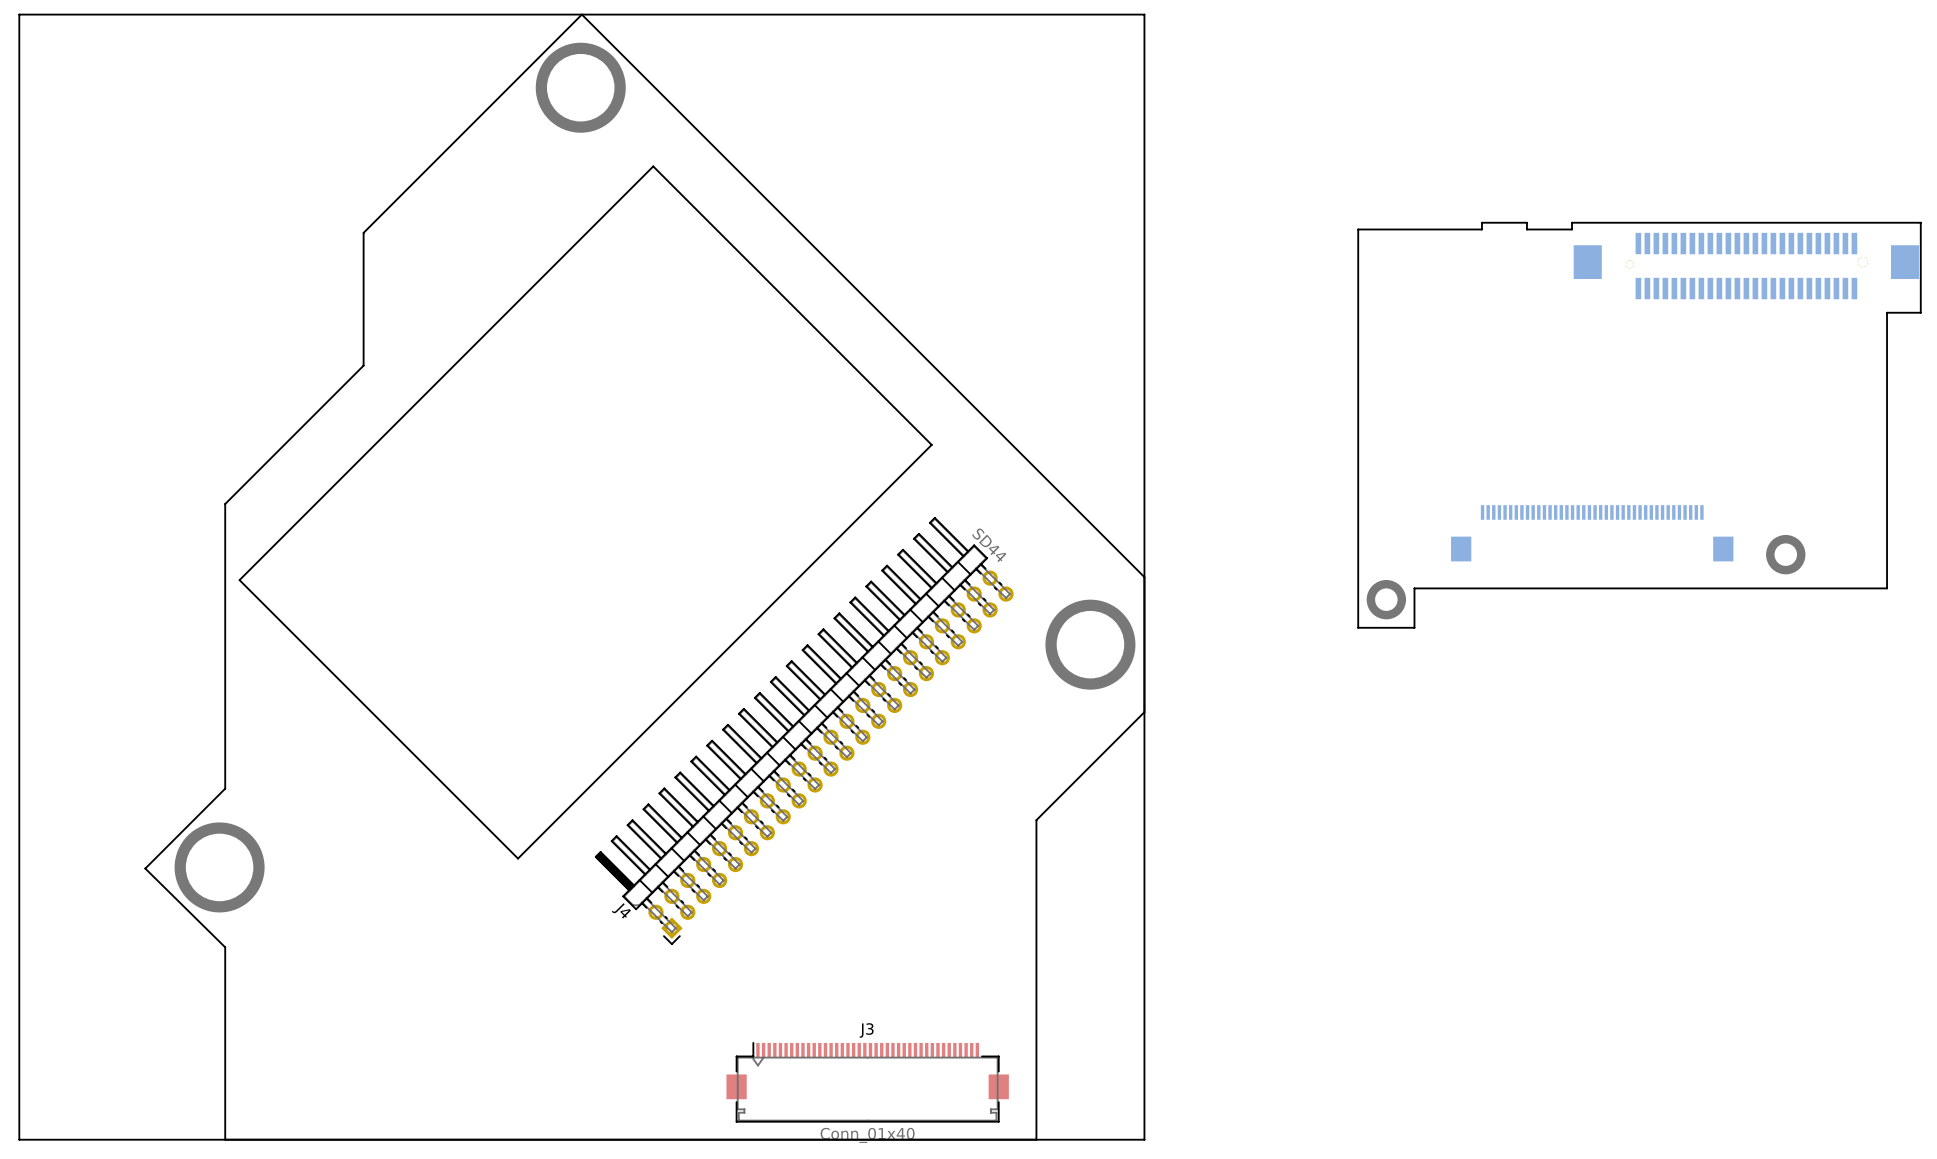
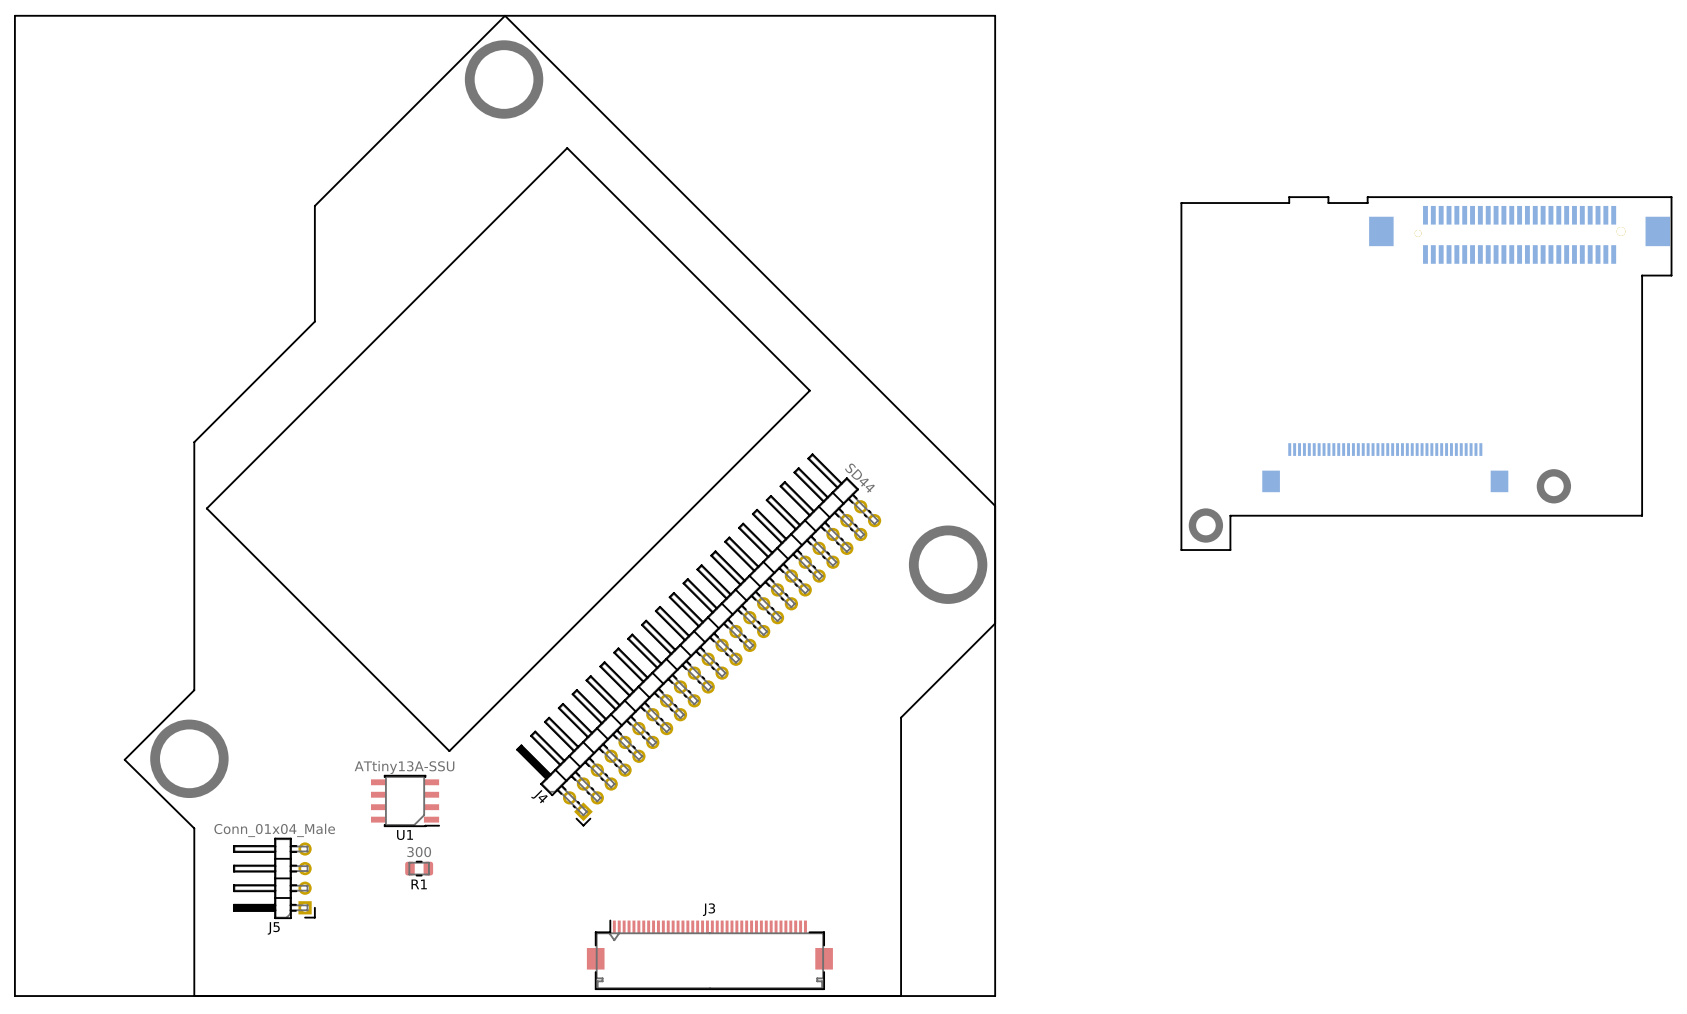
U1: none -> ATtiny13A-SSU (405, 800)
R1: none -> 300 (419, 868)
J5: none -> Conn_01x04_Male (274, 878)
J3 position: (867, 1082) -> (709, 954)
J3 value: Conn_01x40 (867, 1135) -> none

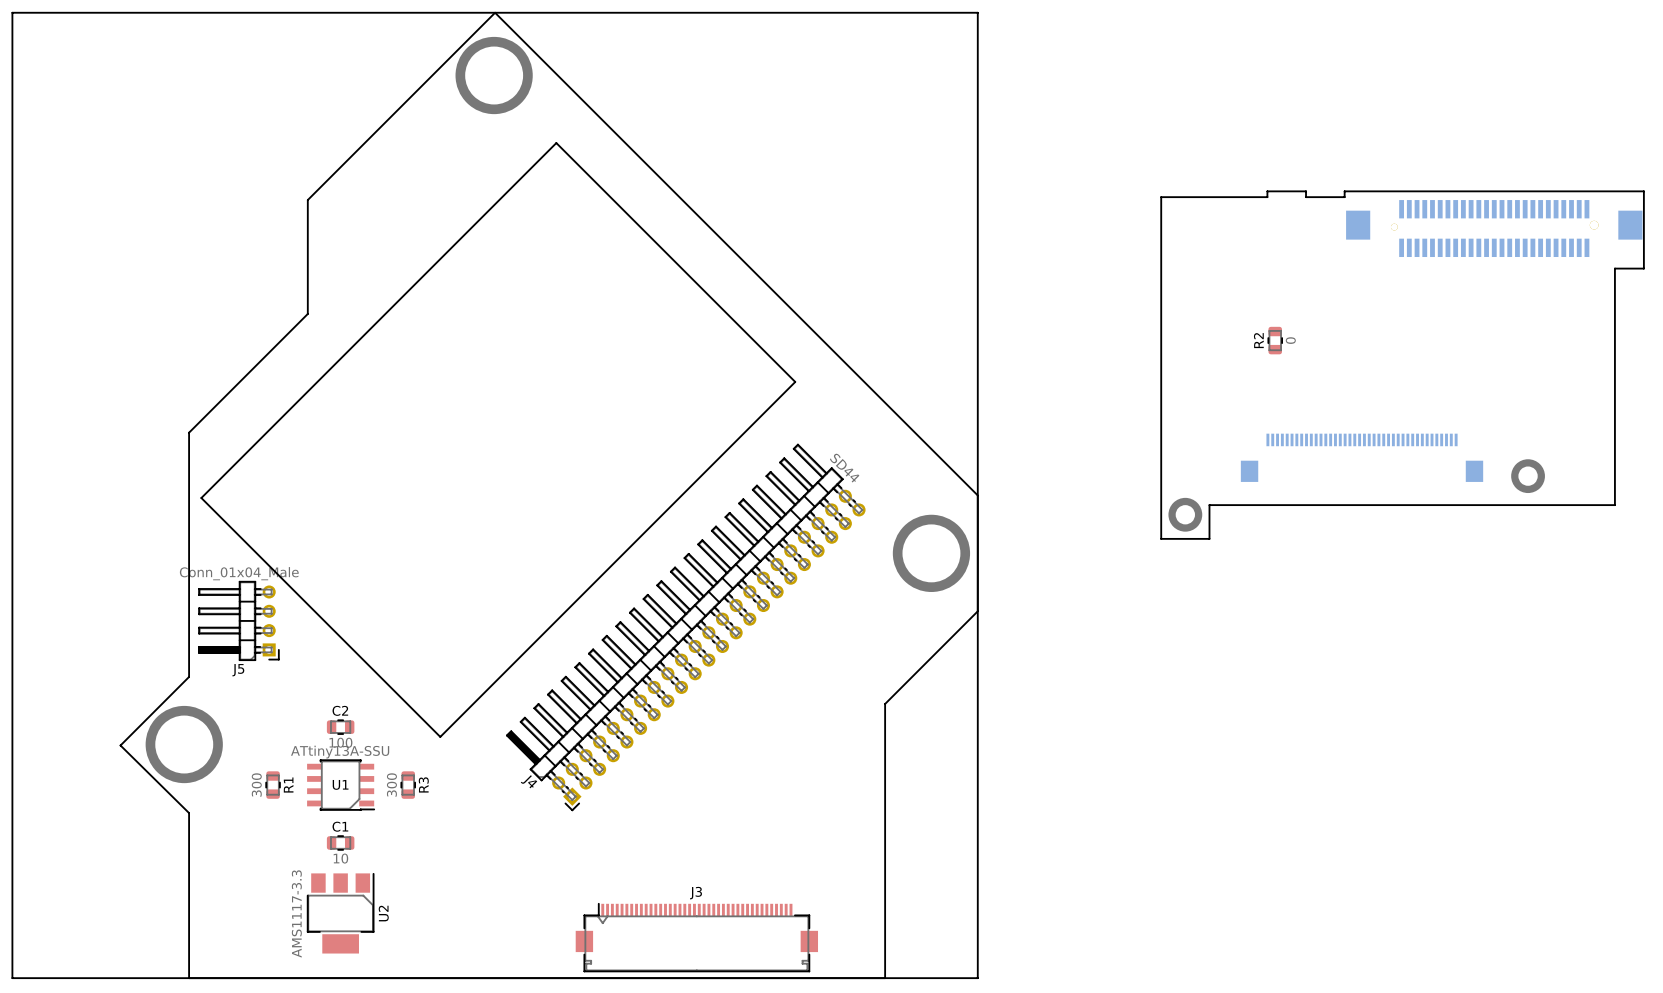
R2: none -> 0 (1275, 340)
C2: none -> 100 (340, 727)
R3: none -> 300 (408, 785)
U1 position: (405, 800) -> (341, 785)
U1 name position: U1 (405, 835) -> U1 (340, 784)
R1 value position: 300 (419, 852) -> 300 (256, 785)
C1: none -> 10 (340, 842)
R1 rotation: 0° (419, 868) -> 90° clockwise (273, 785)
R1 position: (419, 868) -> (273, 785)
J5 position: (274, 878) -> (238, 620)
R1 name position: R1 (419, 884) -> R1 (288, 785)
U2: none -> AMS1117-3.3 (340, 913)

